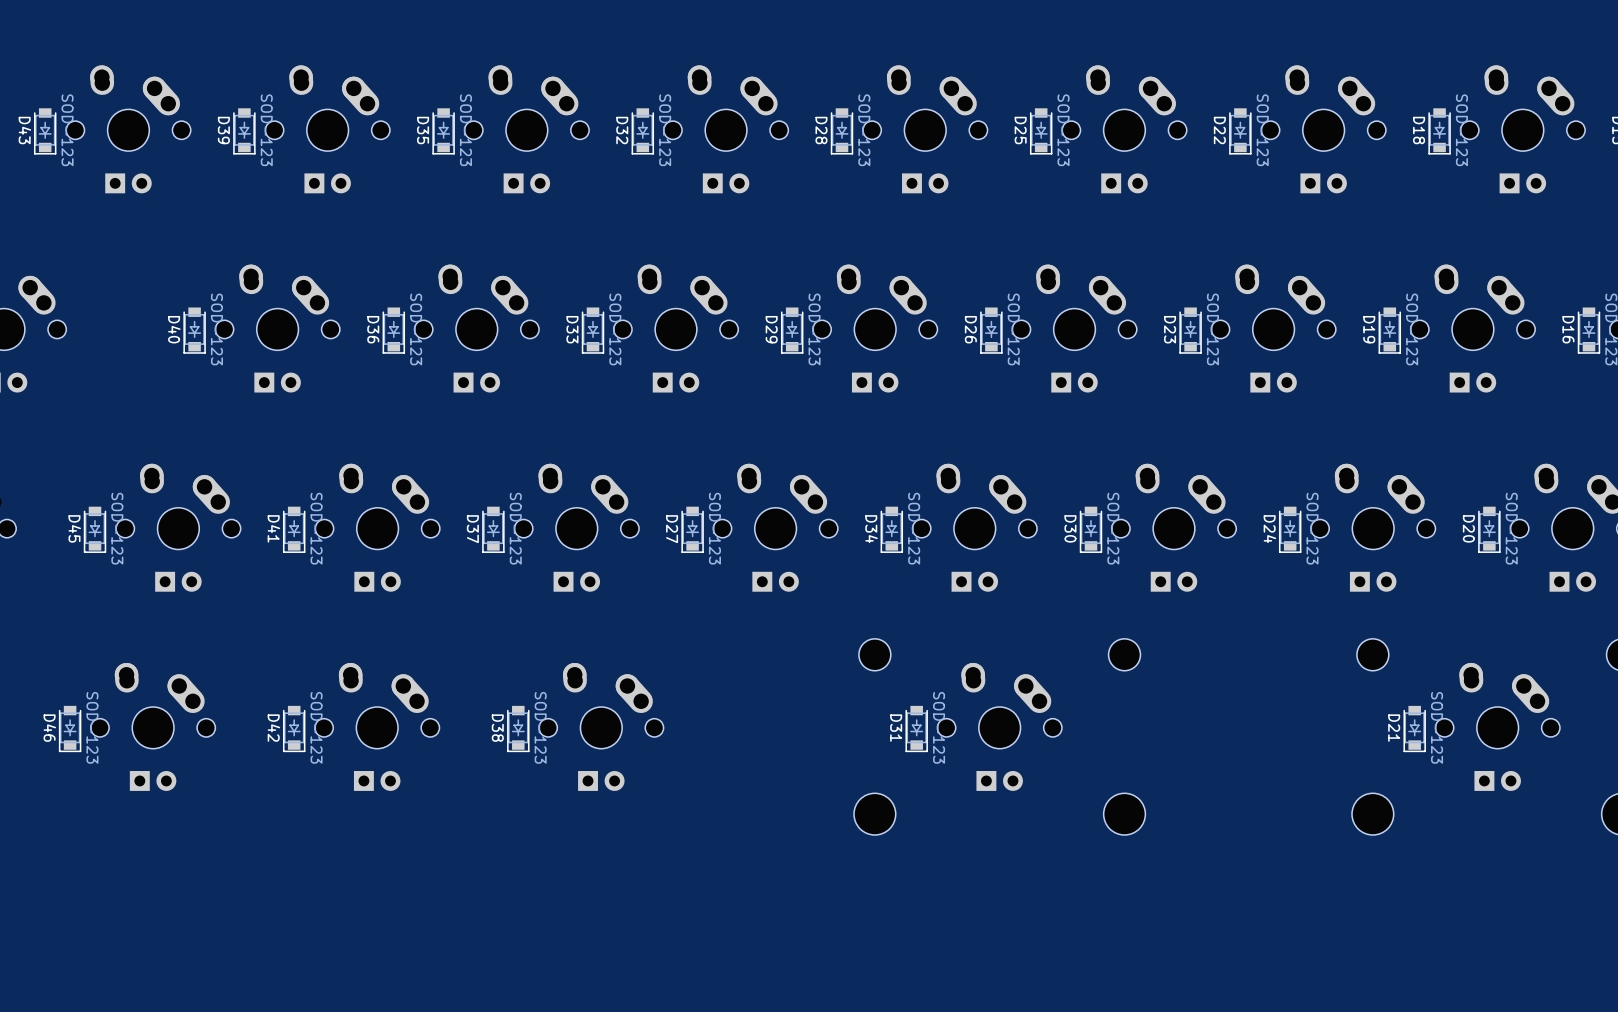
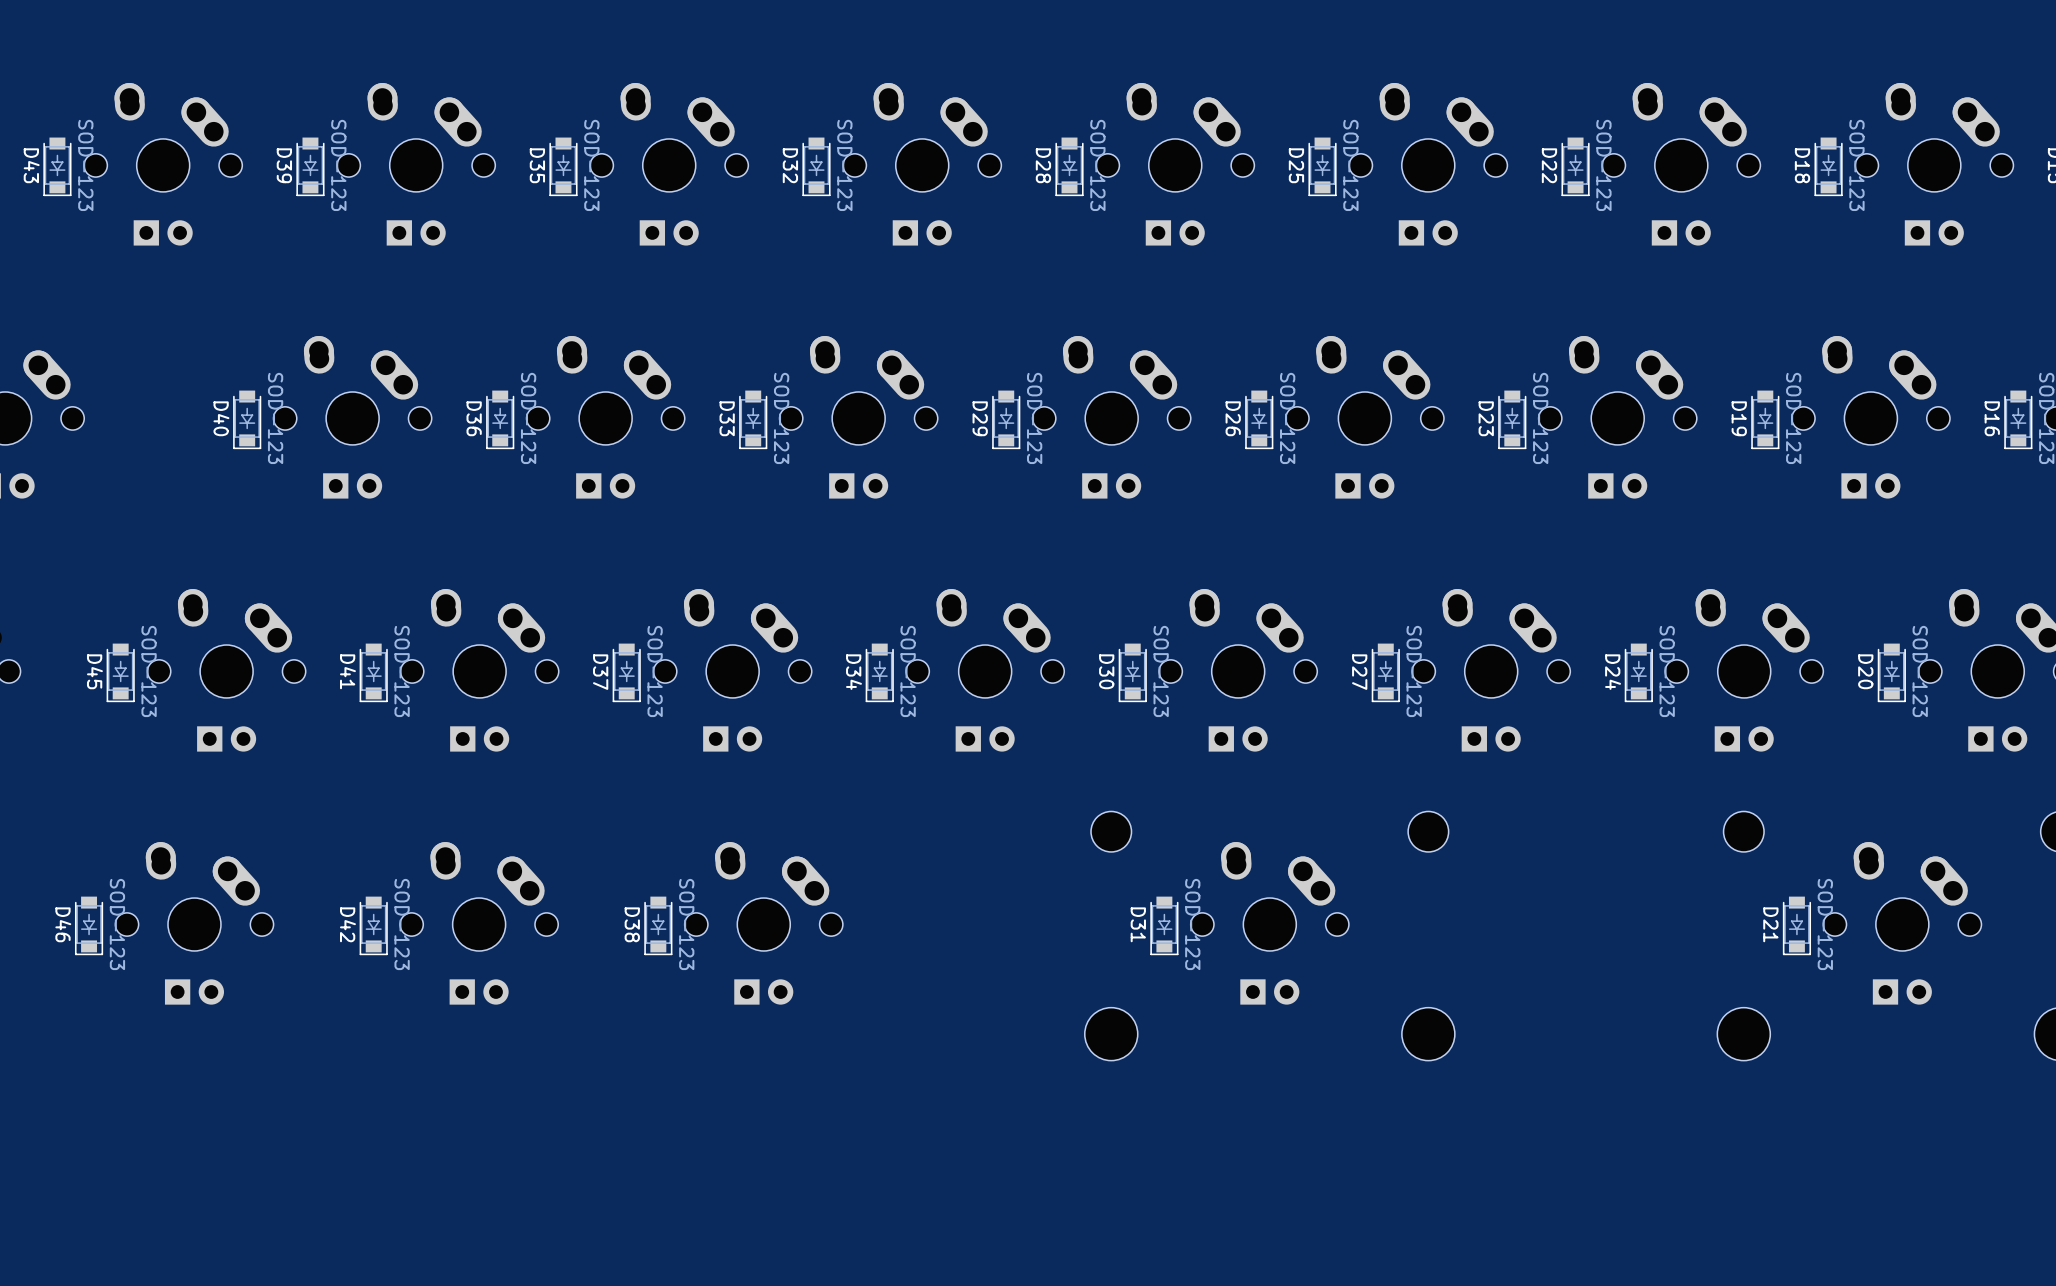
D30 name: D30 (1070, 528) -> D27 (1359, 672)
D27 name: D27 (672, 529) -> D34 (853, 672)
D34 name: D34 (871, 529) -> D30 (1106, 671)

